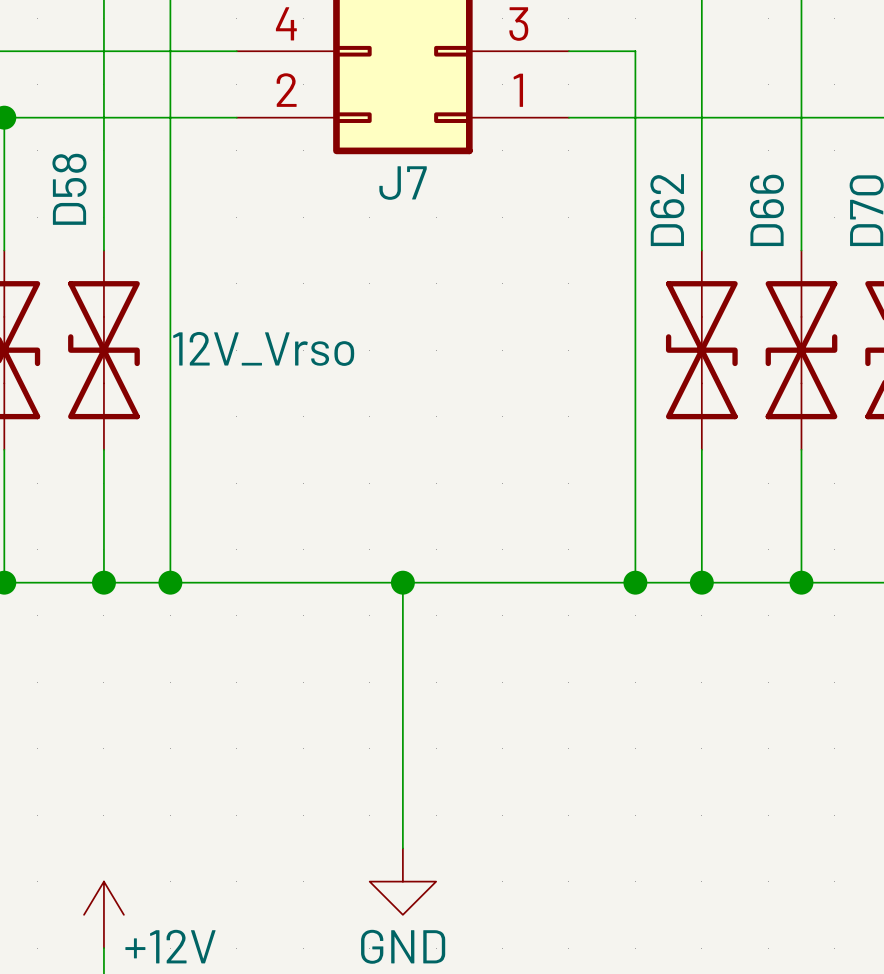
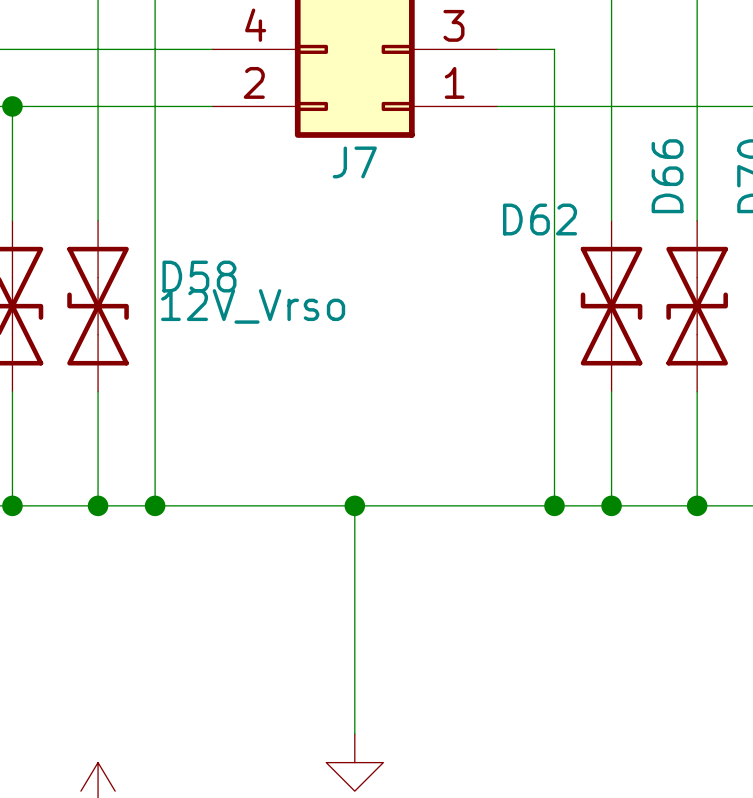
D58 name rotation: 0° (69, 189) -> 90° clockwise (199, 276)
D58 name position: D58 (69, 189) -> D58 (199, 276)
D62 name rotation: 0° (667, 210) -> 90° clockwise (540, 219)

